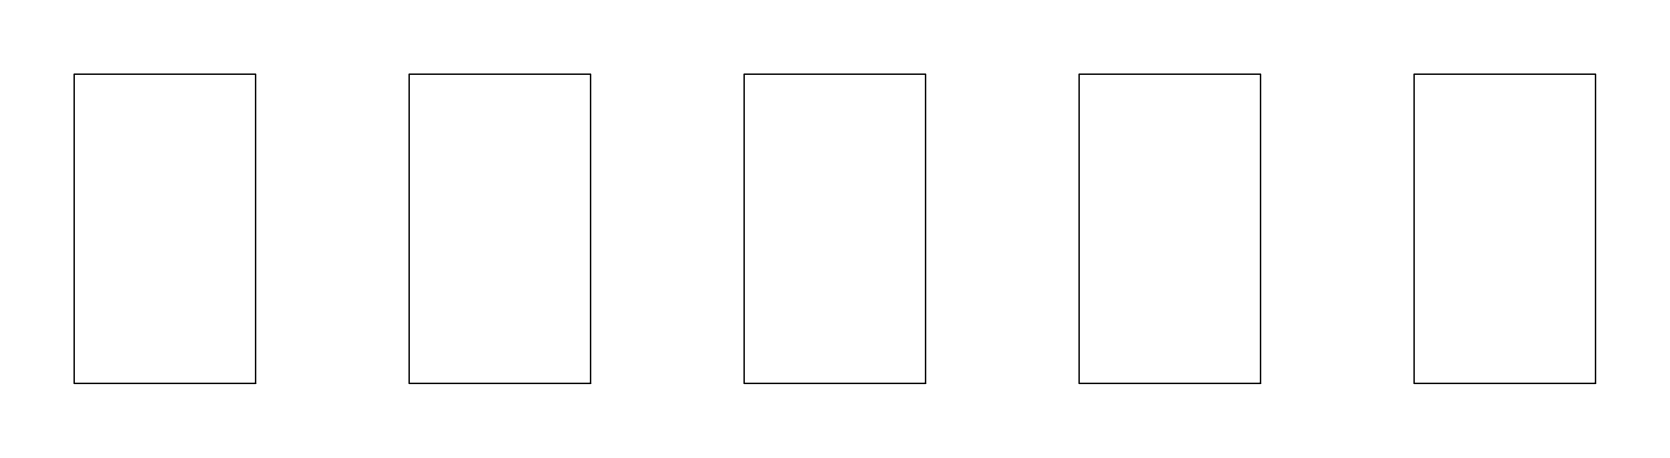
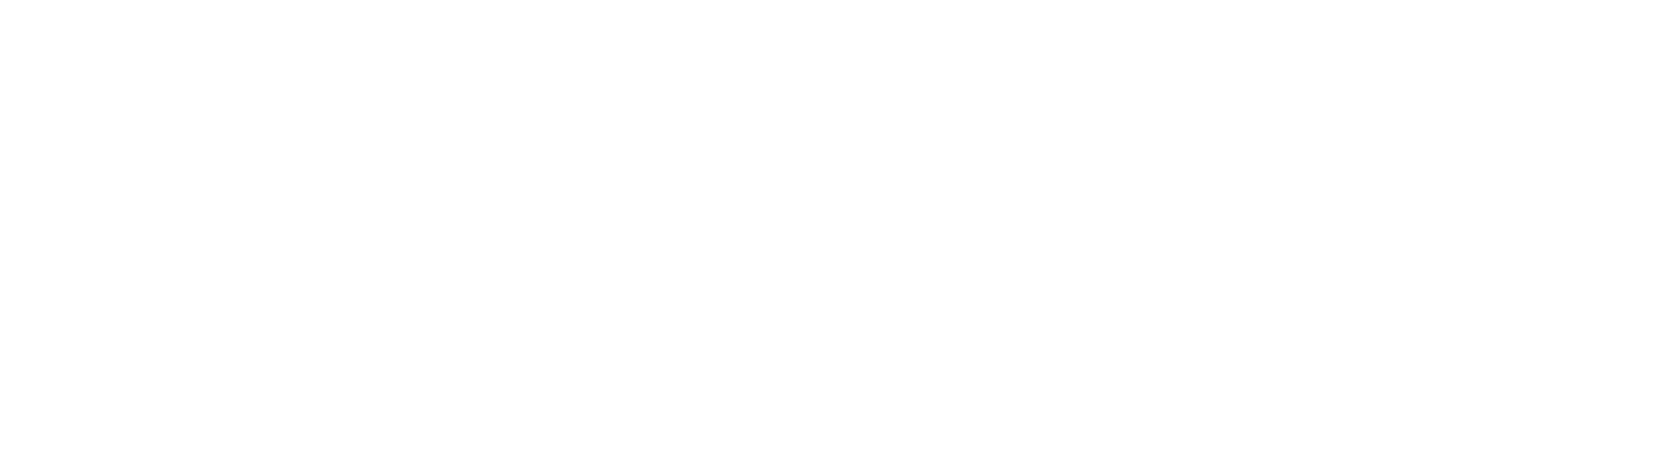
part: (164, 228) -> none
part: (499, 228) -> none
part: (834, 228) -> none
part: (1169, 228) -> none
part: (1504, 228) -> none

